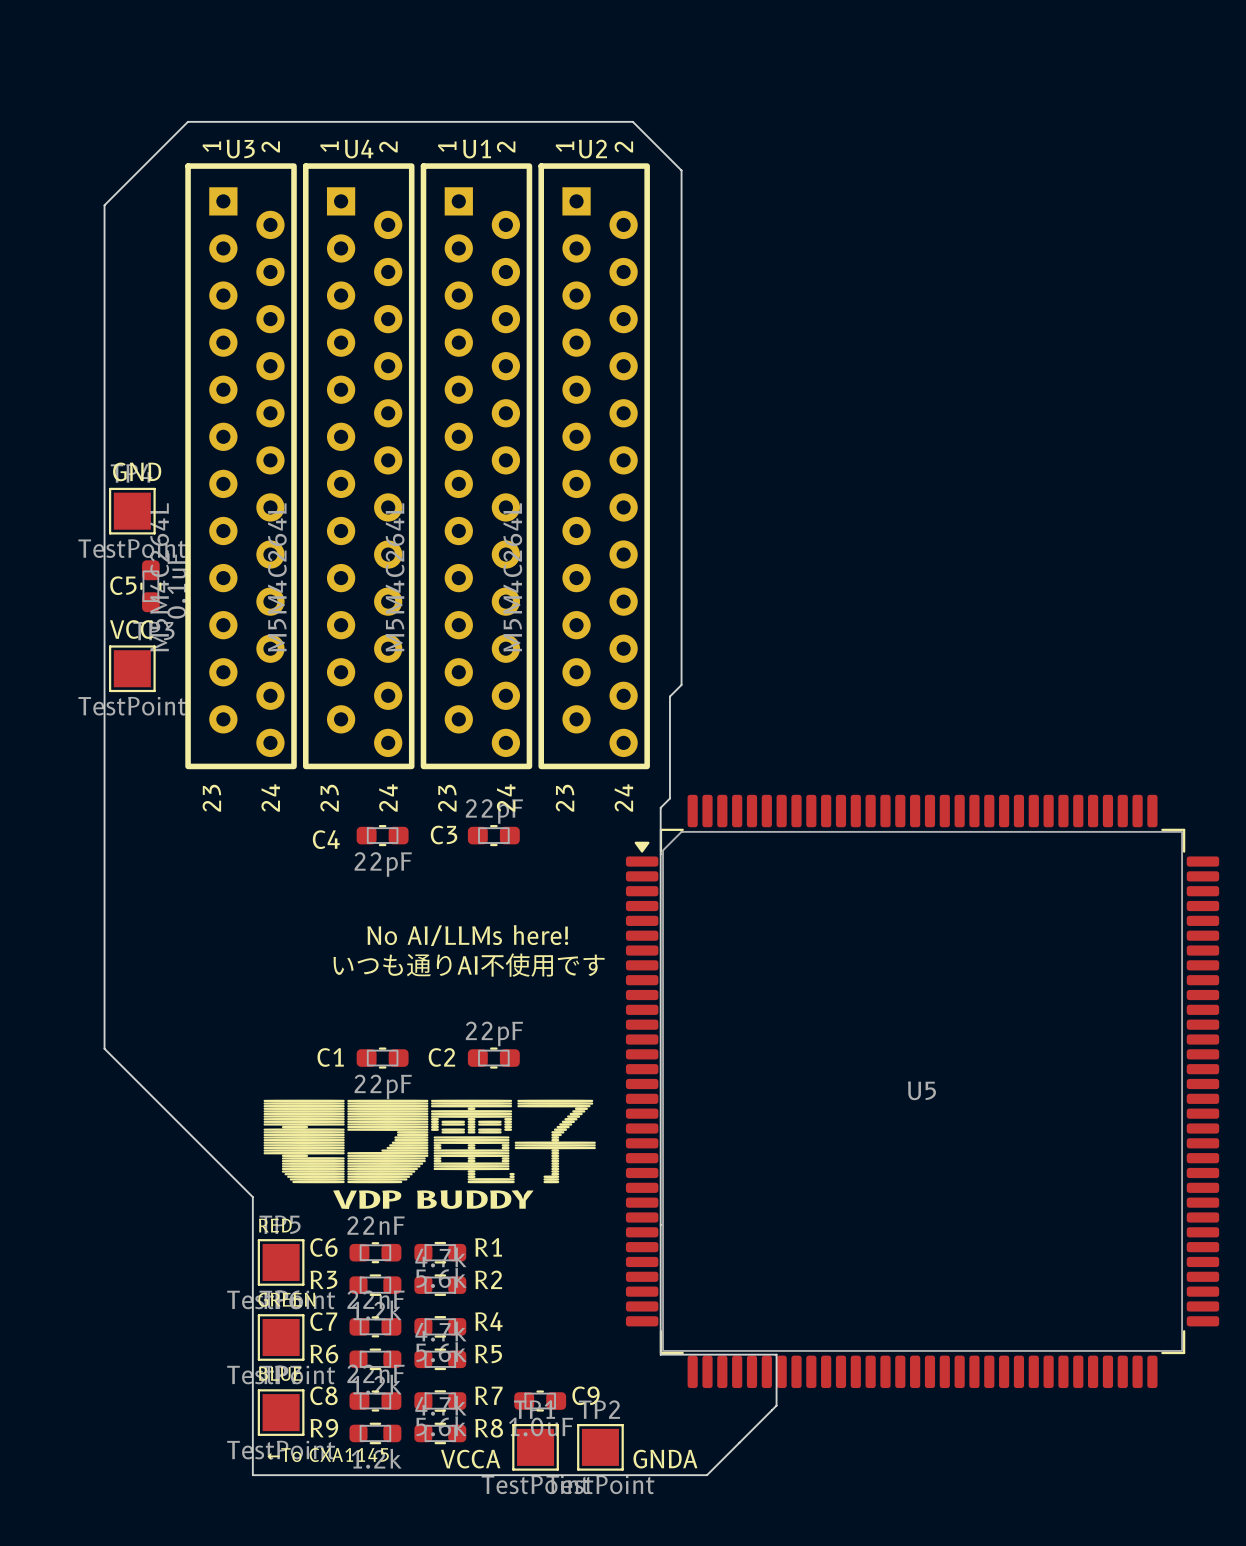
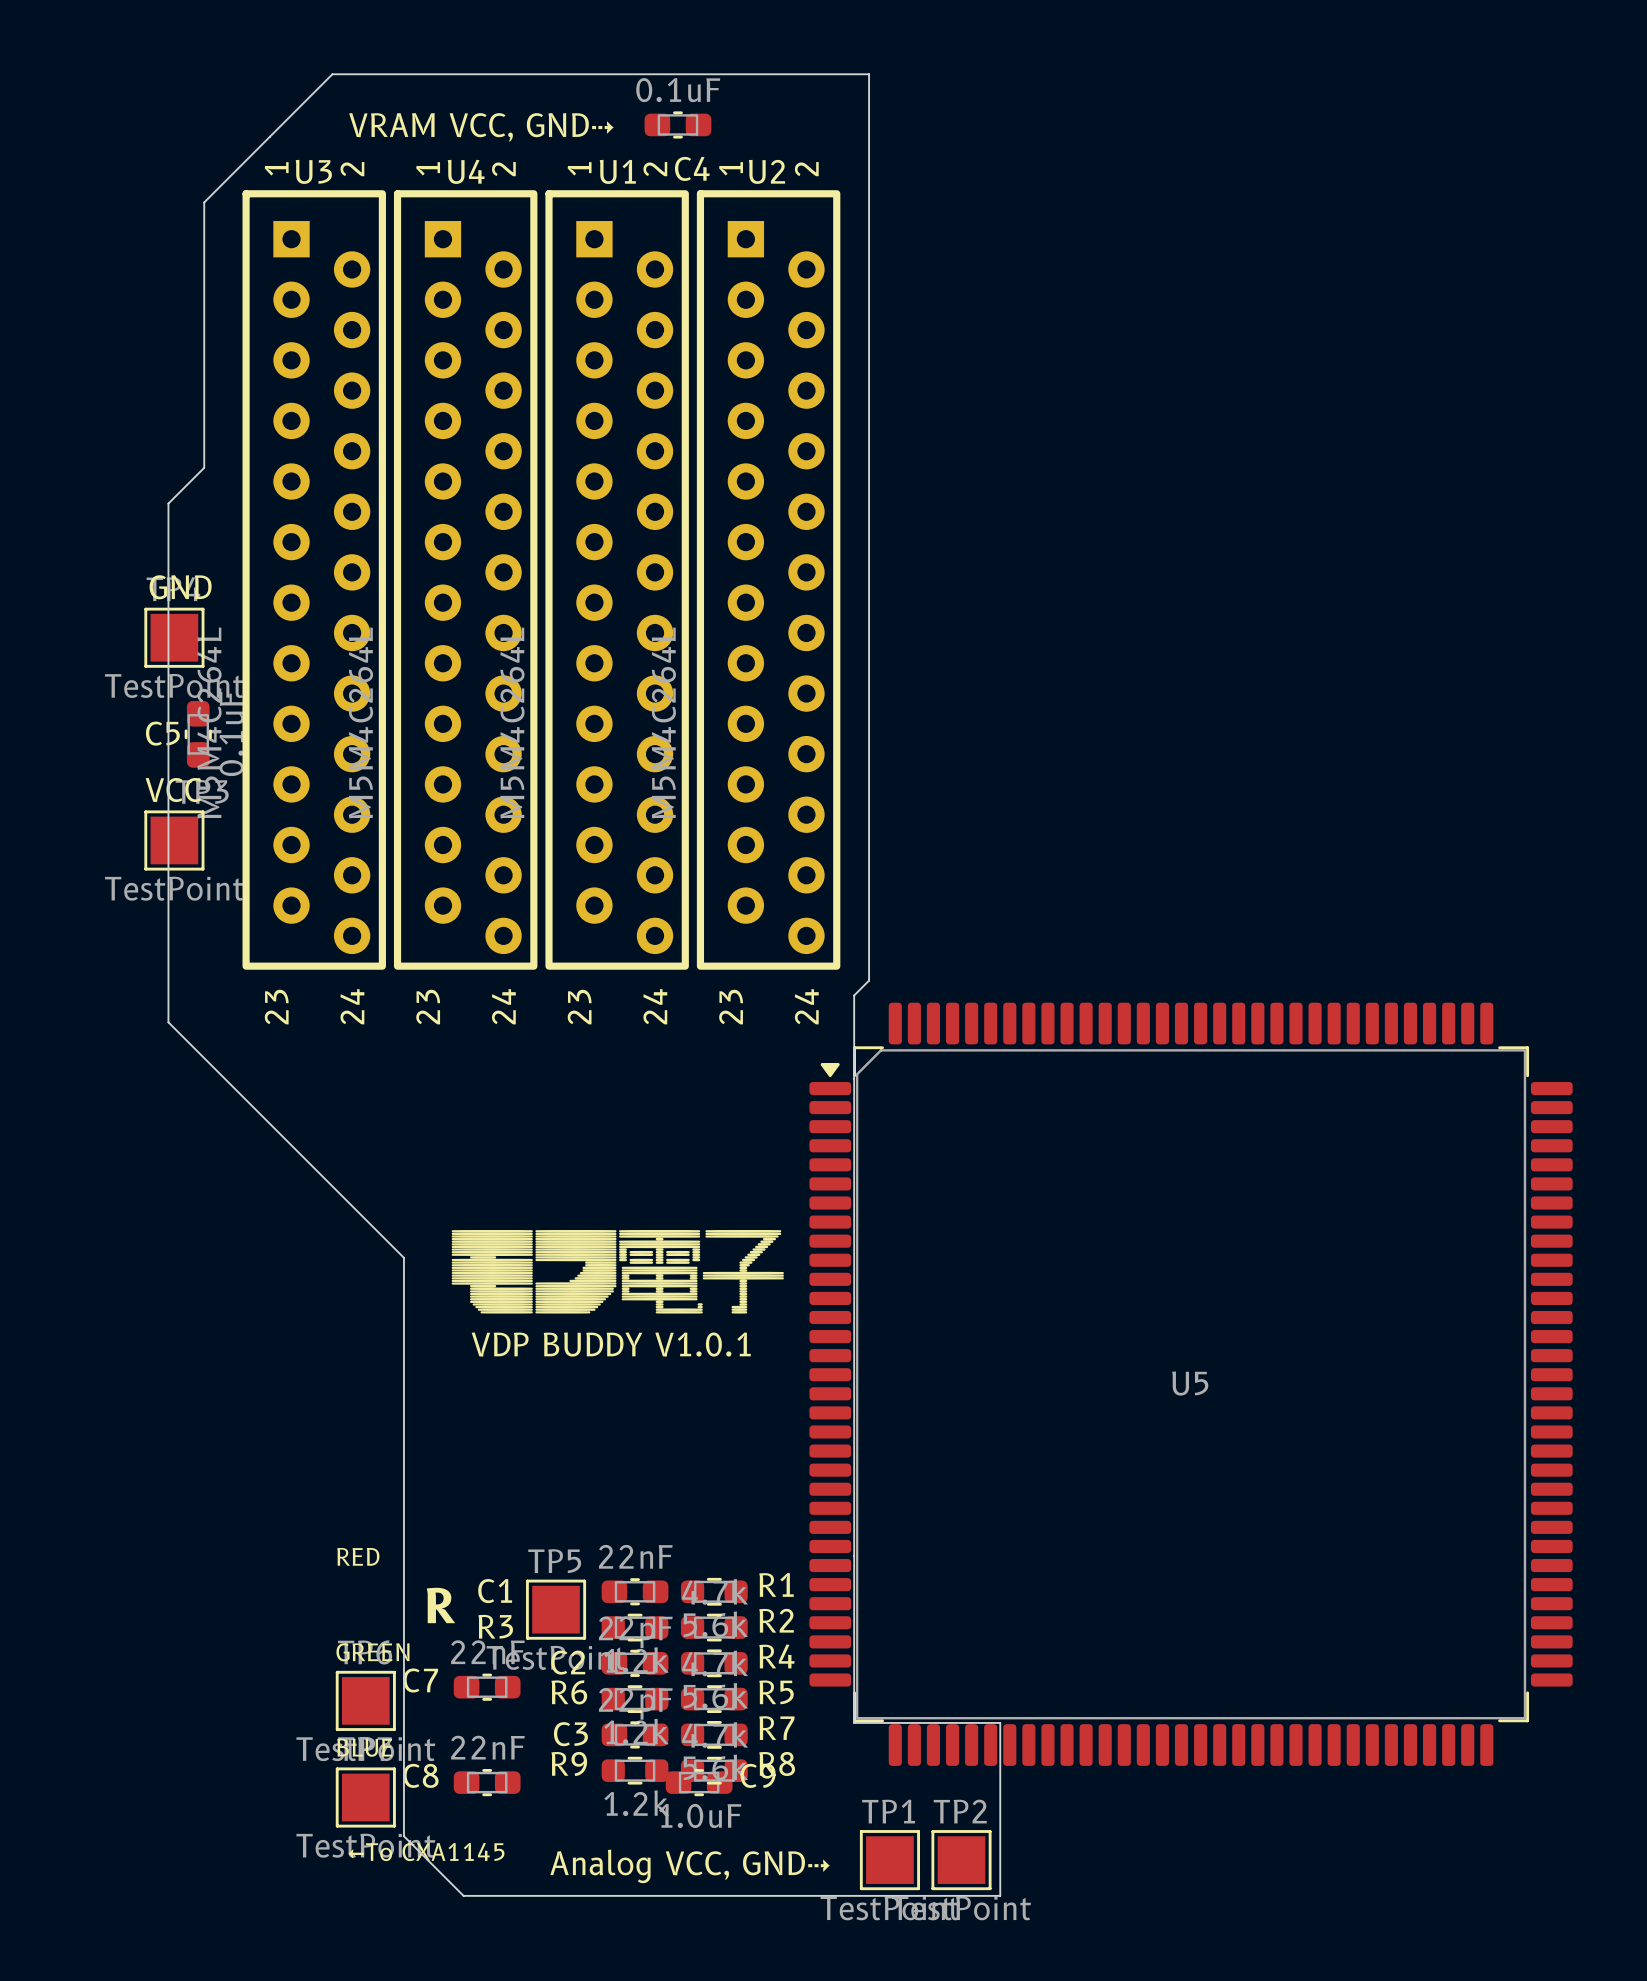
text: none -> VRAM VCC, GND⇢ (481, 127)
board edge: (660, 807) (669, 798) (669, 696) (681, 684) (681, 170) (632, 121) (187, 121) (104, 205) (104, 1048) (252, 1197) (252, 1475) (707, 1475) (776, 1405) (776, 1354) (774, 1354) -> (854, 1019) (854, 995) (869, 980) (869, 74) (332, 74) (204, 202) (204, 467) (168, 503) (168, 1022) (403, 1257) (403, 1836) (463, 1895) (1000, 1895) (1000, 1722)
C4 position: (382, 835) -> (677, 124)
C3 position: (493, 835) -> (635, 1734)
C4 name position: C4 (326, 839) -> C4 (692, 168)
C4 value: 22pF (383, 864) -> 0.1uF (678, 90)
text: No AI/LLMs here! (467, 935) -> none
text: いつも通りAI不使用です (469, 965) -> none
drawing: none -> [451, 1229, 784, 1314]
C1 name position: C1 (330, 1057) -> C1 (495, 1591)
C1 position: (382, 1058) -> (635, 1591)
C2 position: (493, 1058) -> (635, 1663)
text: none -> VDP BUDDY V1.0.1 (611, 1344)
C1 value: 22pF (383, 1086) -> 22nF (635, 1556)
drawing: [263, 1099, 596, 1184] -> none
drawing position: (317, 1179) -> (570, 1299)
text: VDP BUDDY (433, 1199) -> none
C6: 22nF (375, 1252) -> none
R1 position: (440, 1252) -> (714, 1591)
TP5 position: (281, 1262) -> (556, 1609)
text: none -> R (441, 1605)
R3 name position: R3 (323, 1279) -> R3 (495, 1626)
R3 position: (375, 1285) -> (635, 1627)
R2 position: (440, 1285) -> (714, 1627)
R4 position: (440, 1326) -> (714, 1663)
R6 position: (375, 1359) -> (635, 1699)
R5 position: (440, 1359) -> (714, 1699)
R7 position: (440, 1401) -> (714, 1734)
R9 position: (375, 1433) -> (635, 1770)
R8 position: (440, 1433) -> (714, 1770)
TP1 position: (535, 1447) -> (889, 1860)
TP2 position: (600, 1447) -> (961, 1860)
text: VCCA (470, 1459) -> none
text: GNDA (665, 1459) -> none
text: none -> Analog VCC, GND⇢ (690, 1866)

